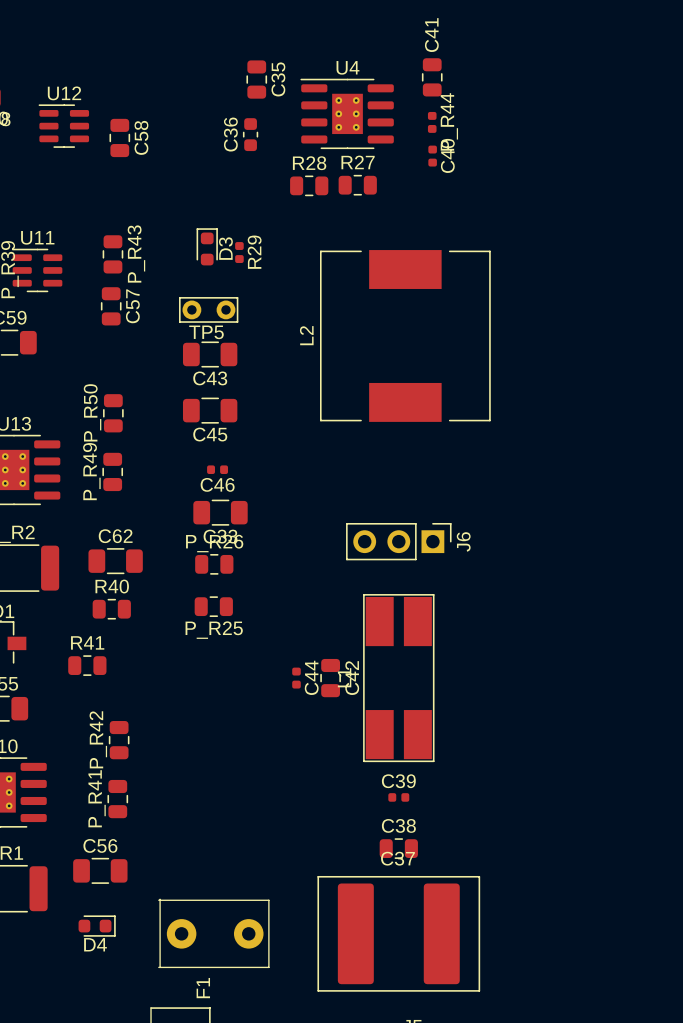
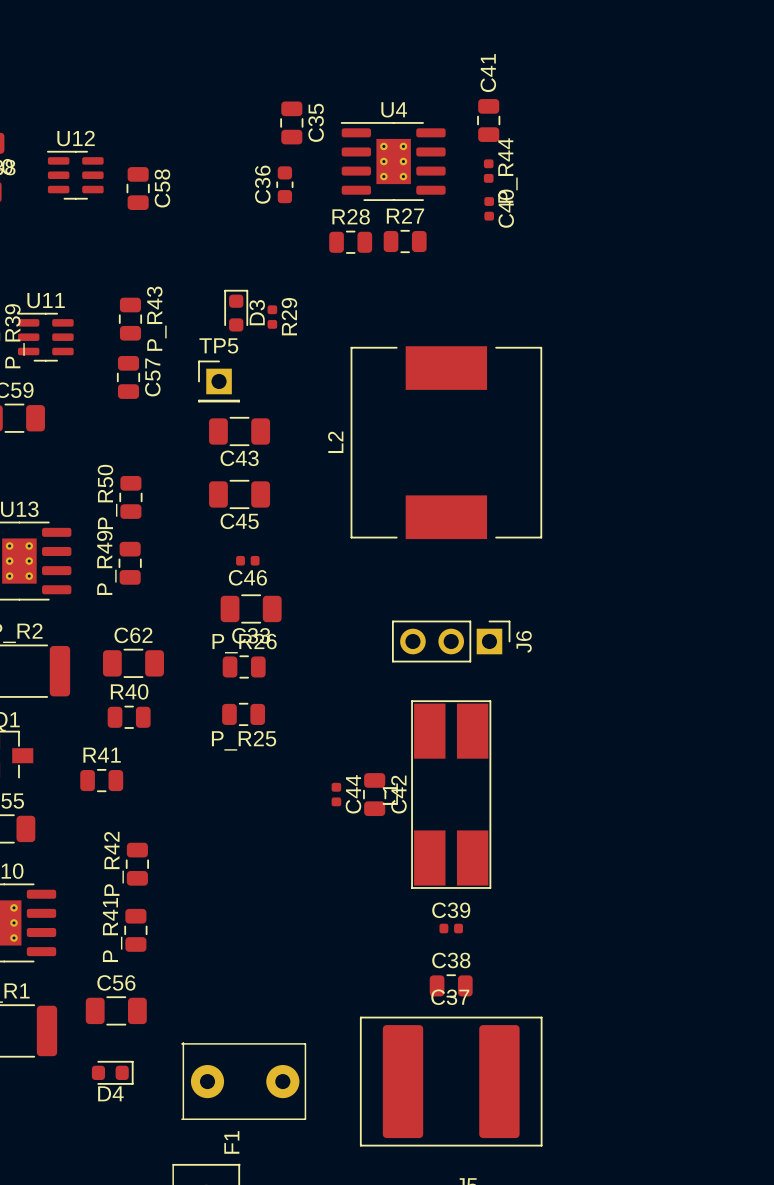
TP5 footprint: [179, 297, 239, 323] -> [198, 360, 240, 403]
TP5 name position: TP5 (206, 332) -> TP5 (218, 345)
L2 position: (405, 335) -> (446, 442)

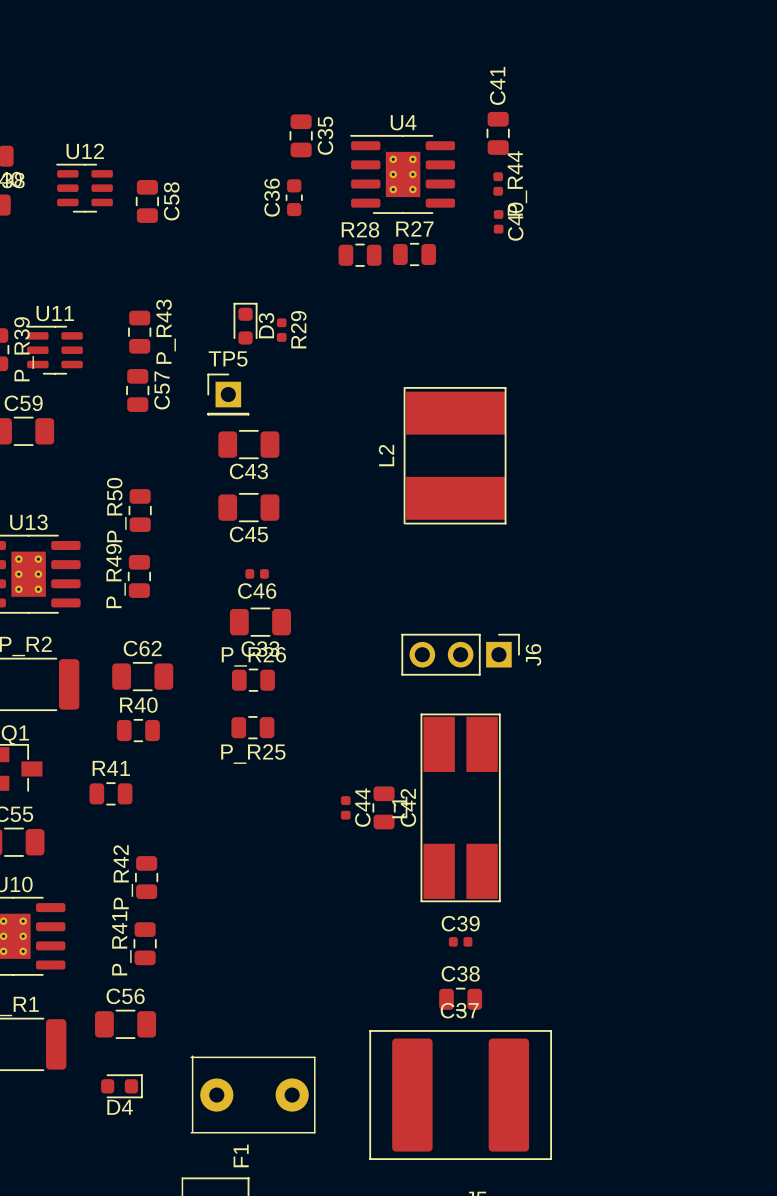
L2 footprint: [350, 346, 543, 540] -> [403, 386, 507, 525]
L2 name position: L2 (335, 442) -> L2 (386, 455)

